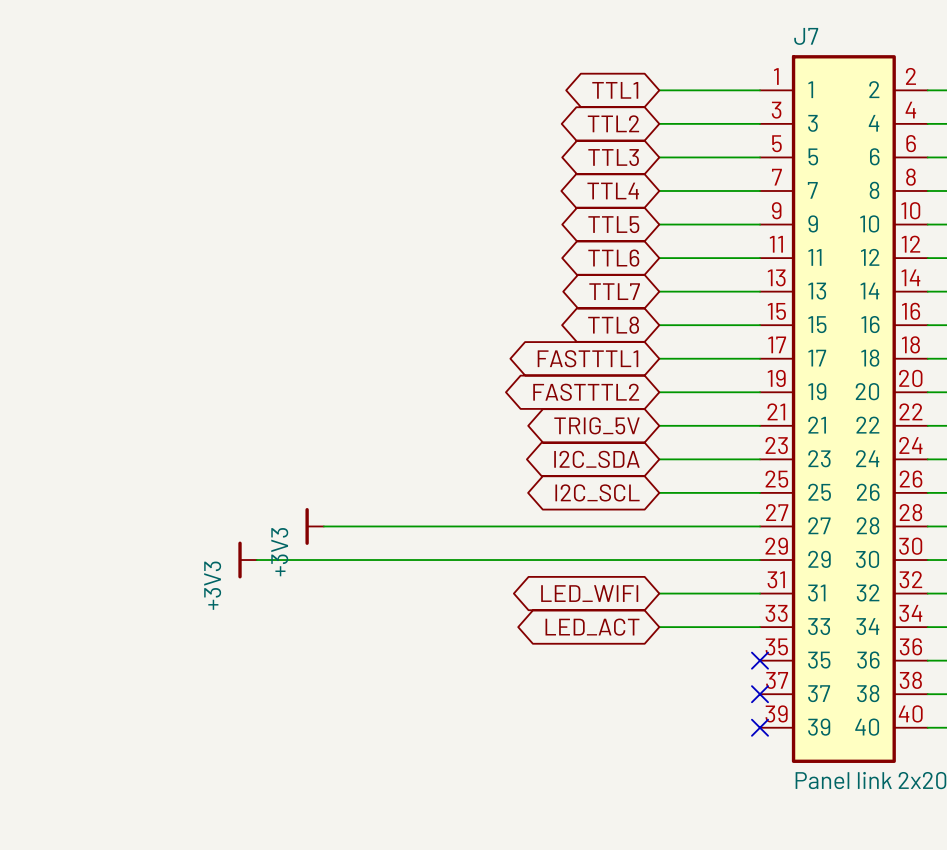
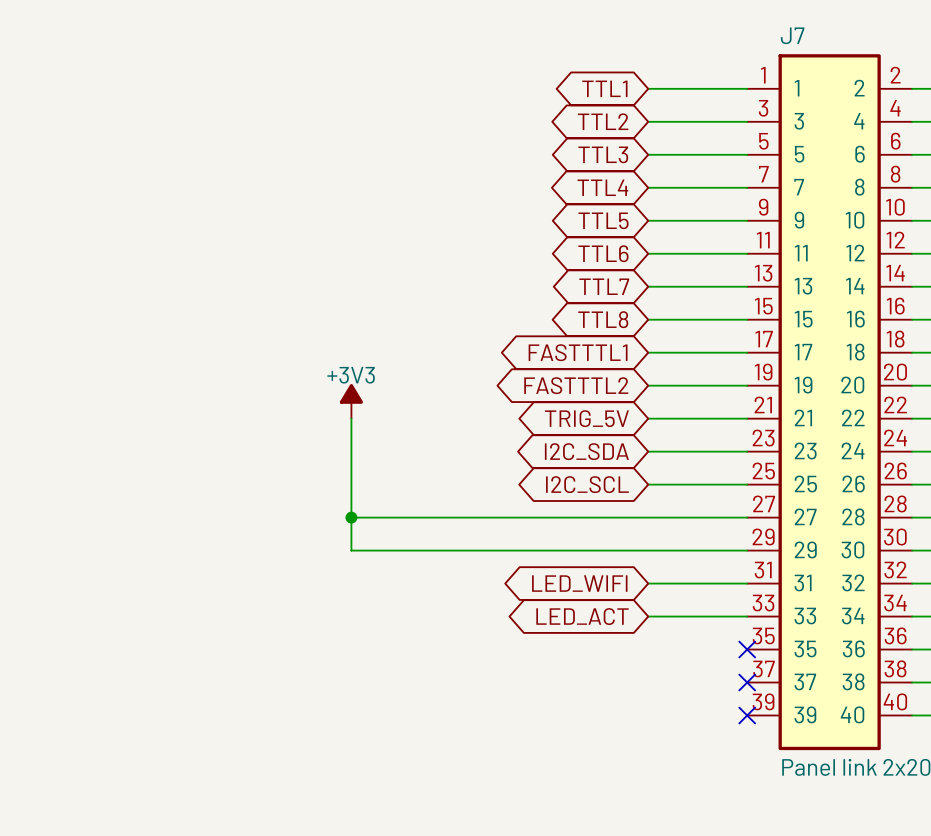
power symbol: none -> +3V3 (351, 401)
power symbol: +3V3 (314, 526) -> none
wire: (323, 526) (357, 526) -> none
junction: none -> (351, 517)
power symbol: +3V3 (247, 560) -> none
wire: (256, 560) (357, 560) -> (351, 418) (351, 550)

